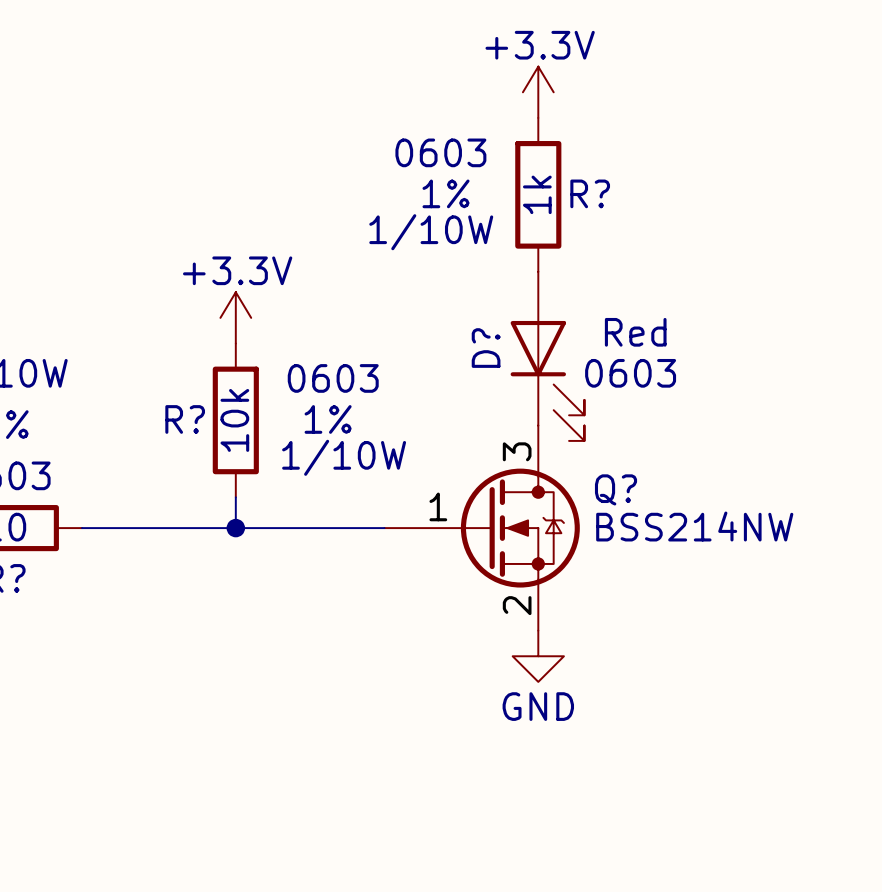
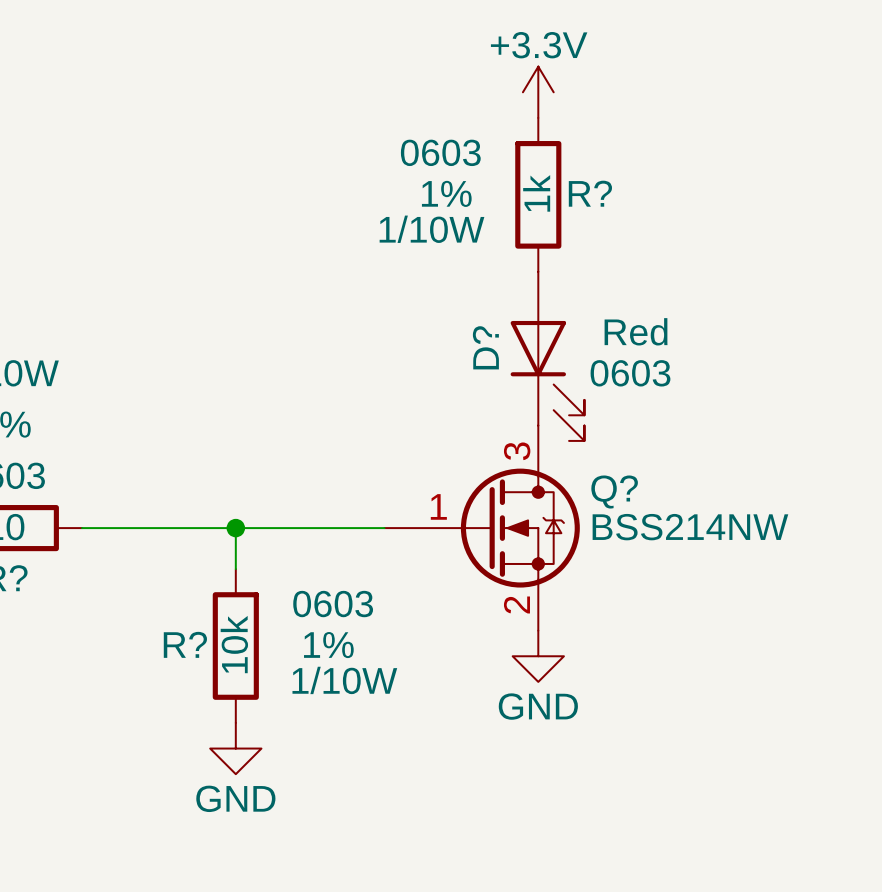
power symbol: +3.3V (235, 317) -> none
R? position: (235, 420) -> (235, 646)
wire: (235, 497) (235, 528) -> (235, 569) (235, 528)
power symbol: none -> GND (235, 748)

